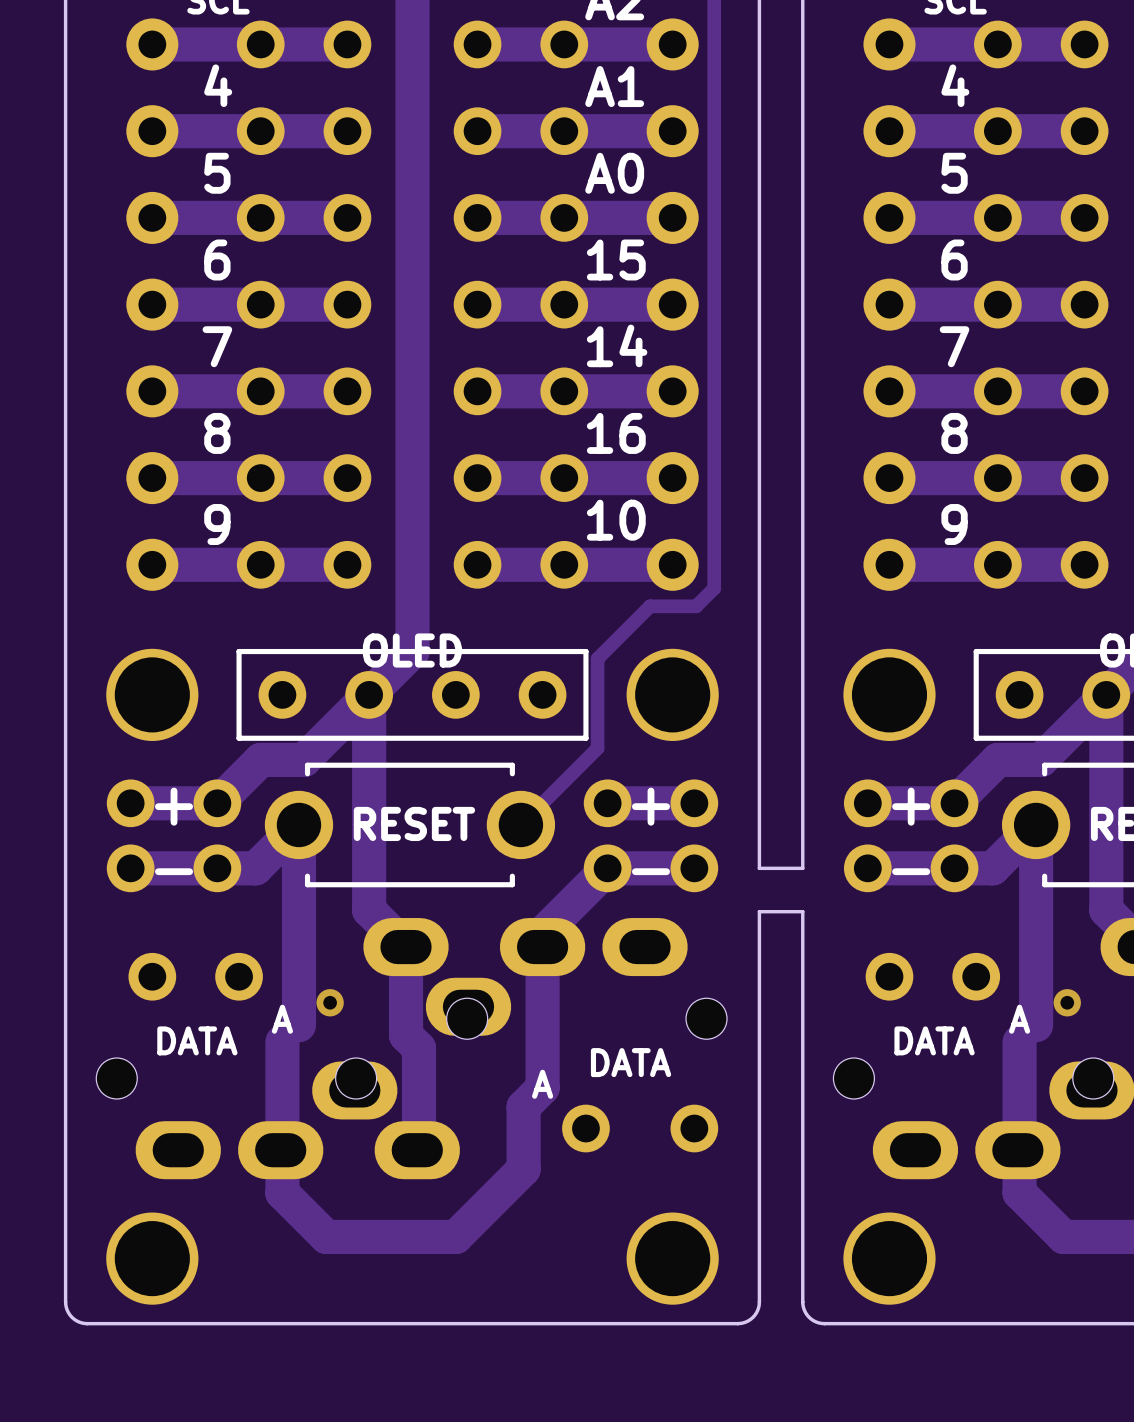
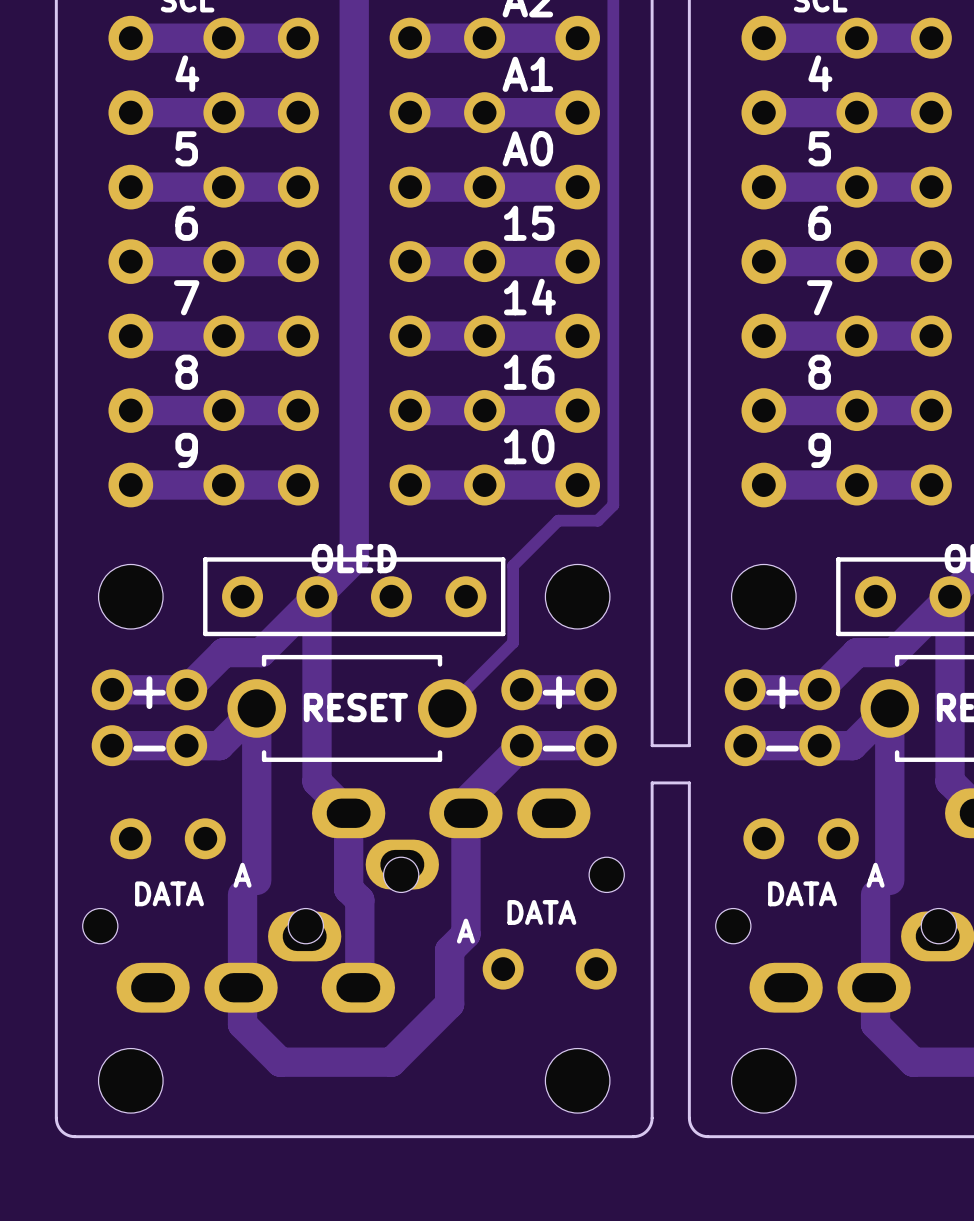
part footprint: [106, 648, 199, 741] -> [98, 564, 164, 629]
part footprint: [626, 648, 719, 741] -> [545, 564, 610, 629]
part footprint: [843, 648, 936, 741] -> [731, 564, 797, 629]
via: (330, 1002) -> none
via: (1067, 1002) -> none
part footprint: [106, 1212, 199, 1305] -> [98, 1048, 164, 1114]
part footprint: [626, 1212, 719, 1305] -> [545, 1048, 610, 1114]
part footprint: [843, 1212, 936, 1305] -> [731, 1048, 797, 1114]

